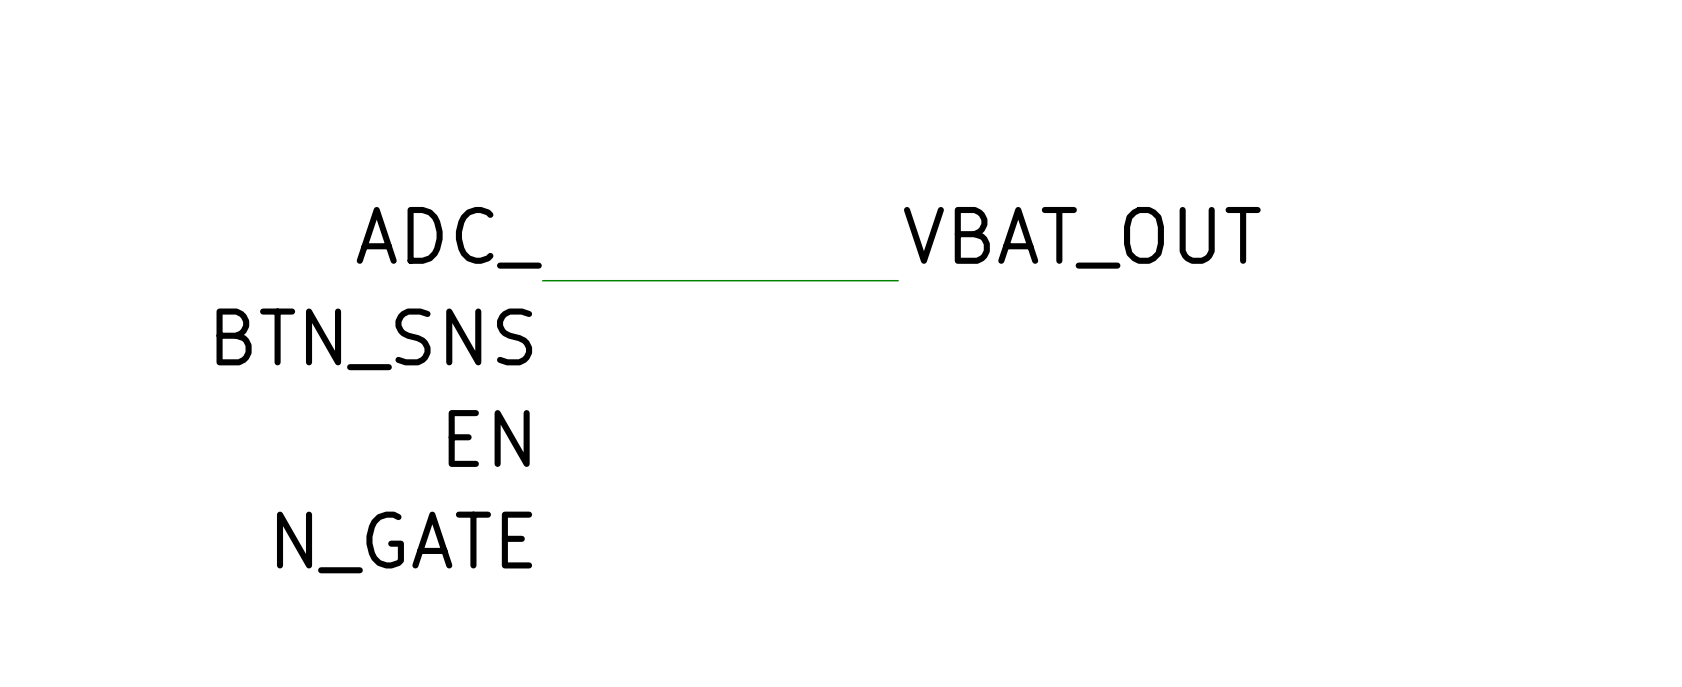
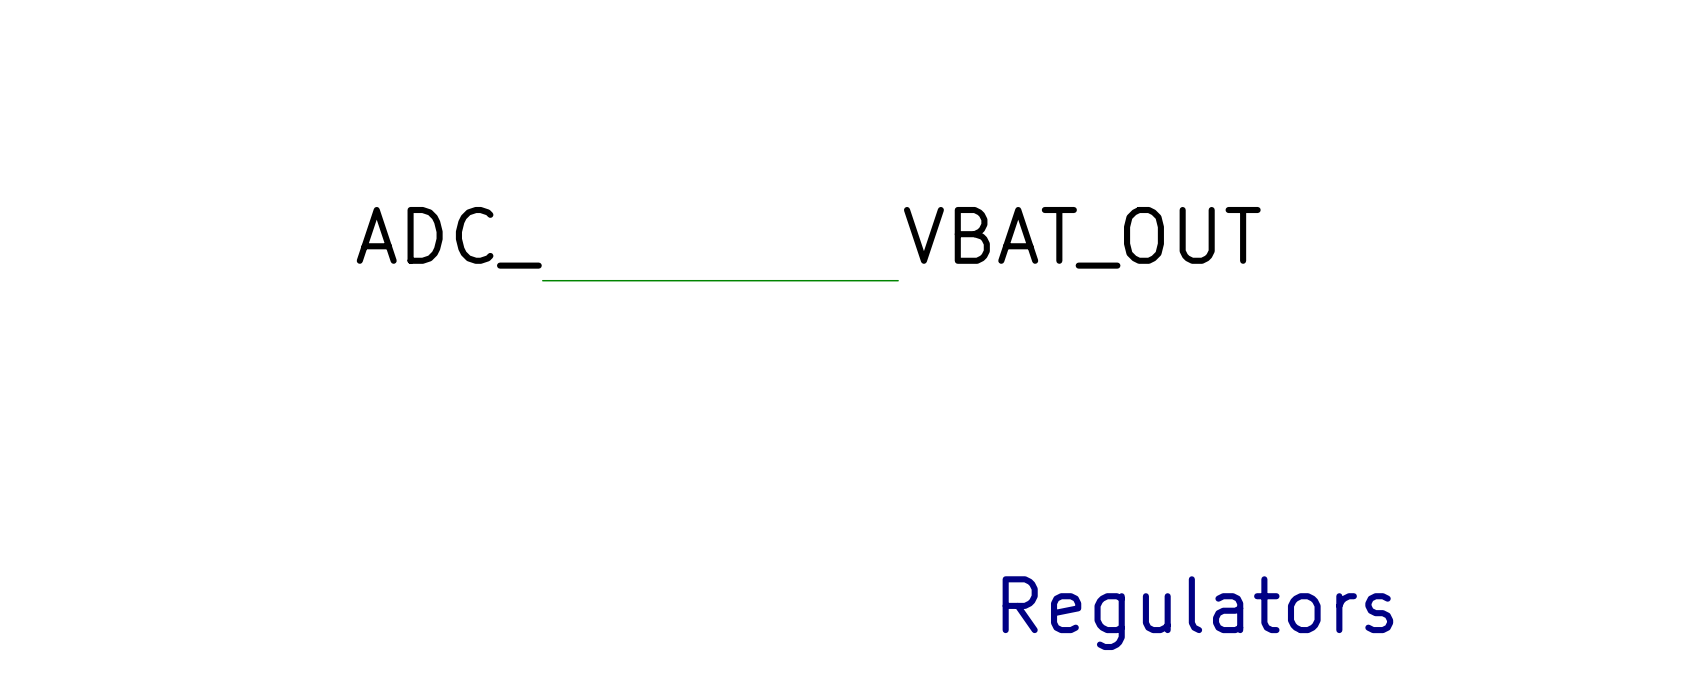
label: BTN_SNS (374, 339) -> none
label: EN (489, 438) -> none
label: N_GATE (404, 542) -> none
text: none -> Regulators (1197, 613)

